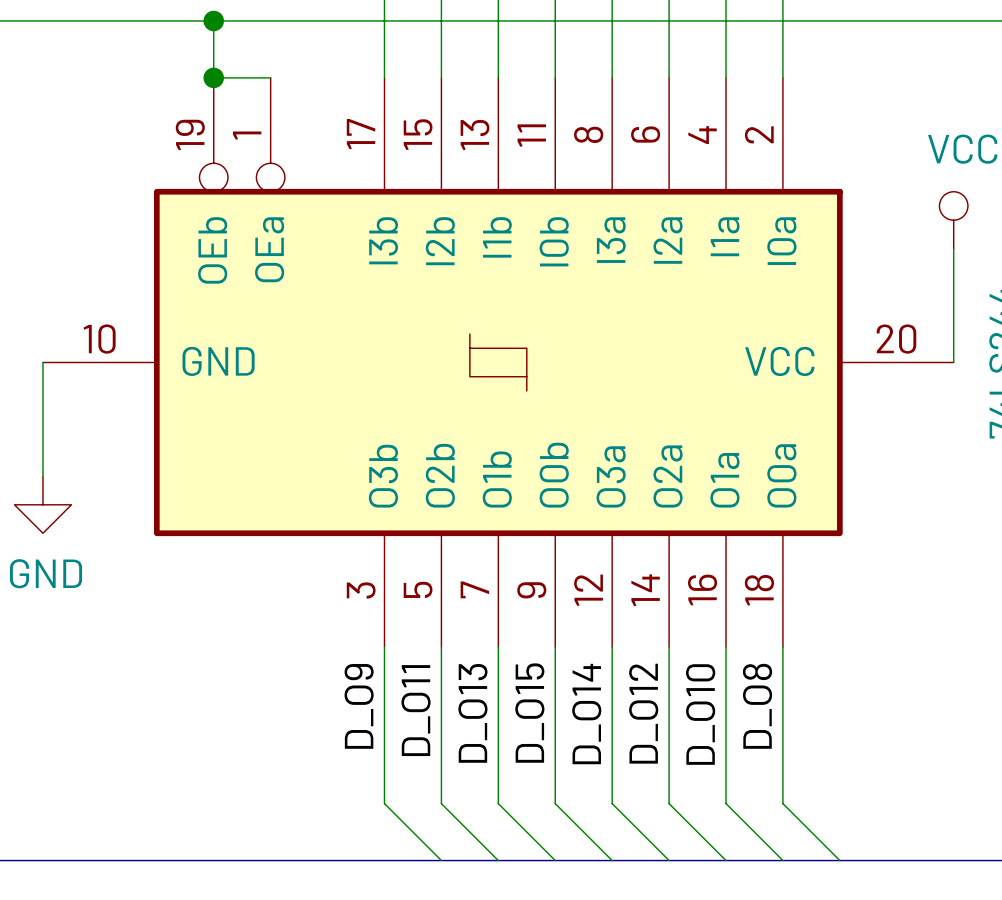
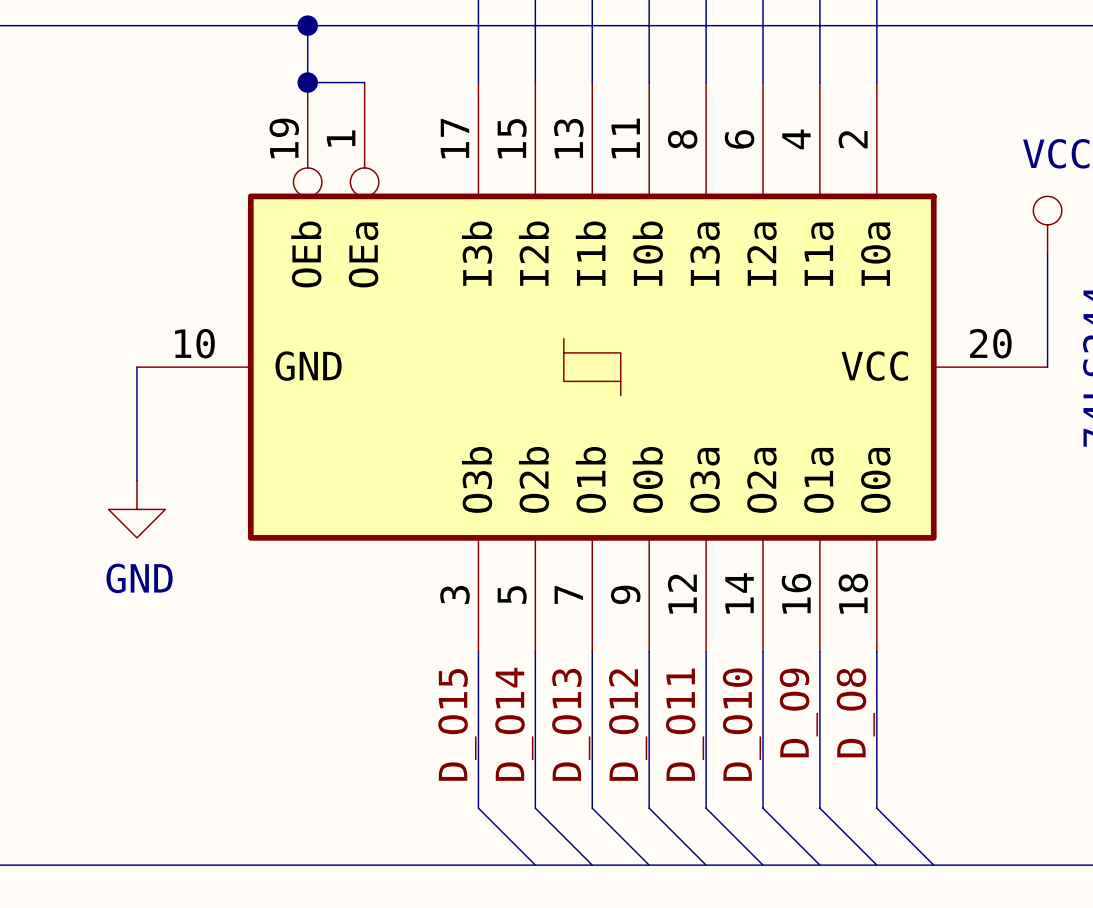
label: D_O9 (359, 706) -> D_O15 (457, 724)
label: D_O11 (416, 710) -> D_O14 (514, 724)
label: D_O15 (529, 713) -> D_O12 (628, 725)
label: D_O12 (643, 713) -> D_O10 (741, 724)
label: D_O14 (586, 714) -> D_O11 (685, 724)
label: D_O10 (700, 714) -> D_O9 (798, 712)

